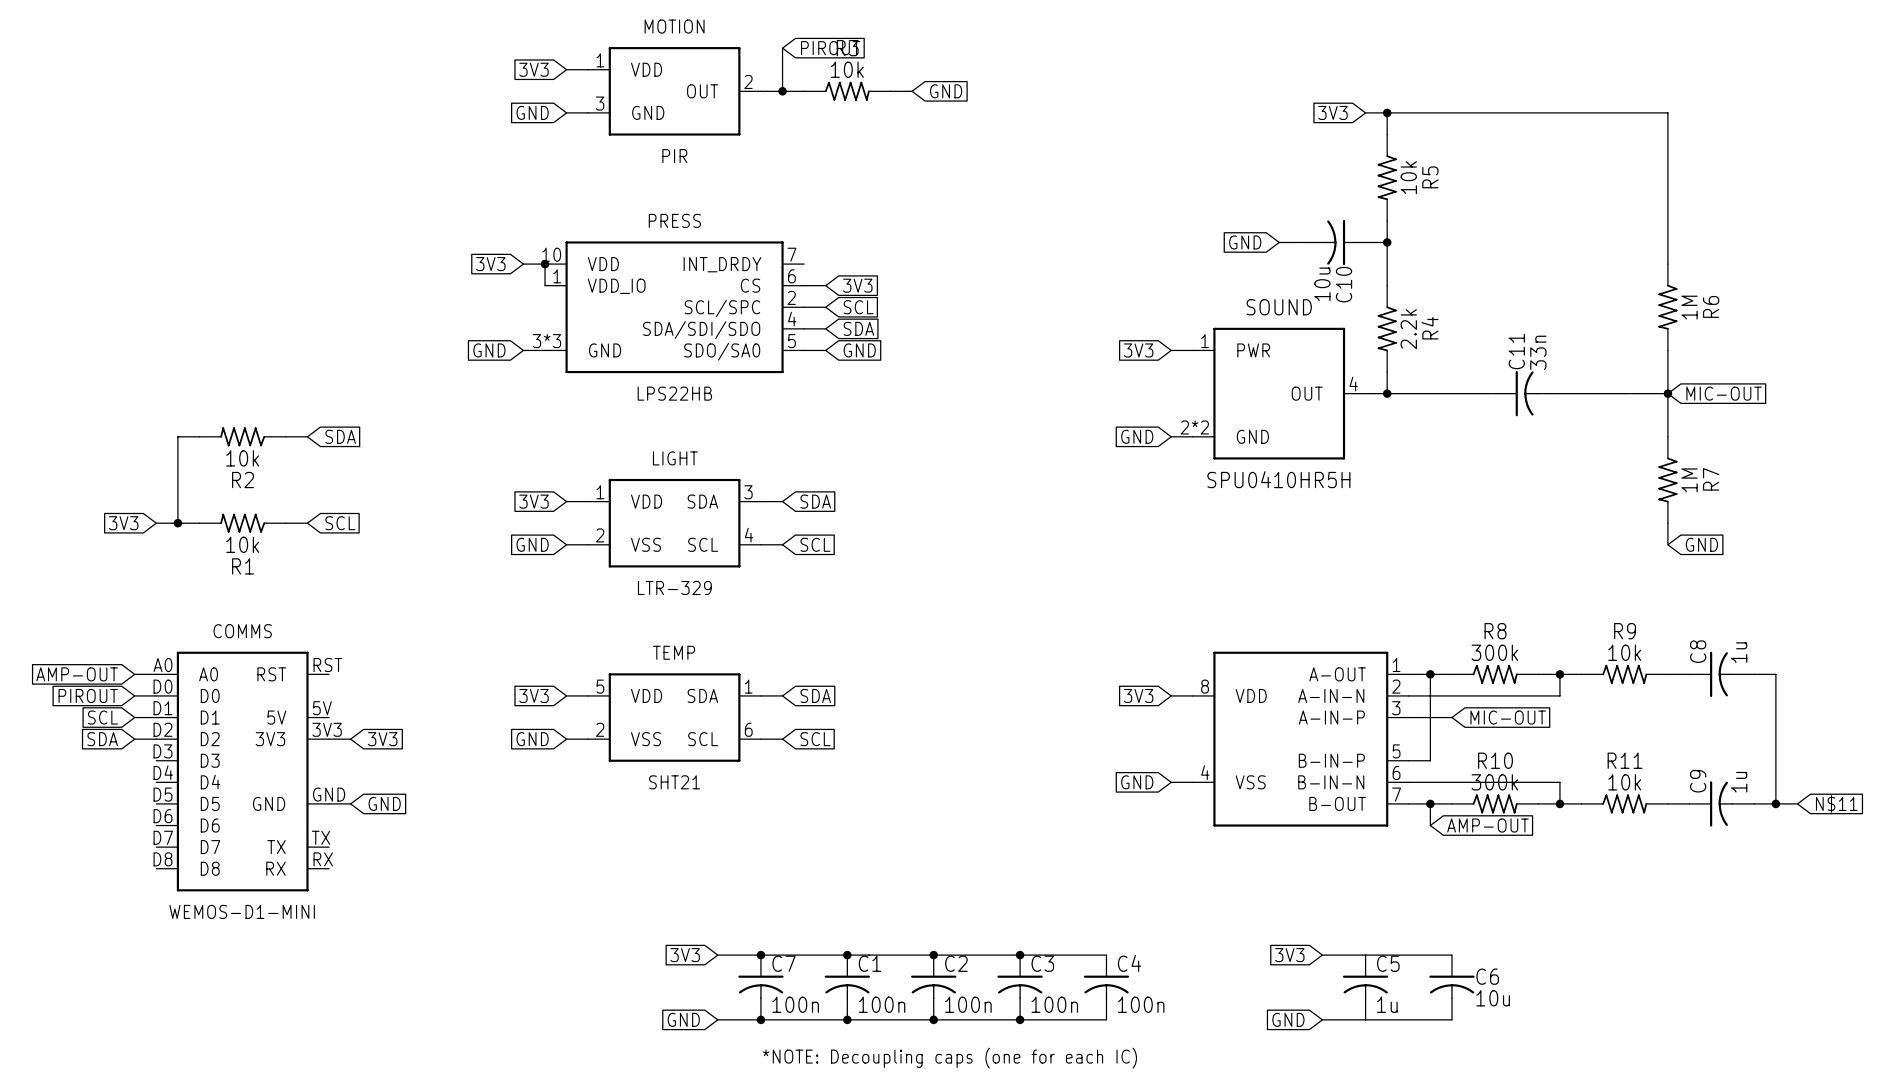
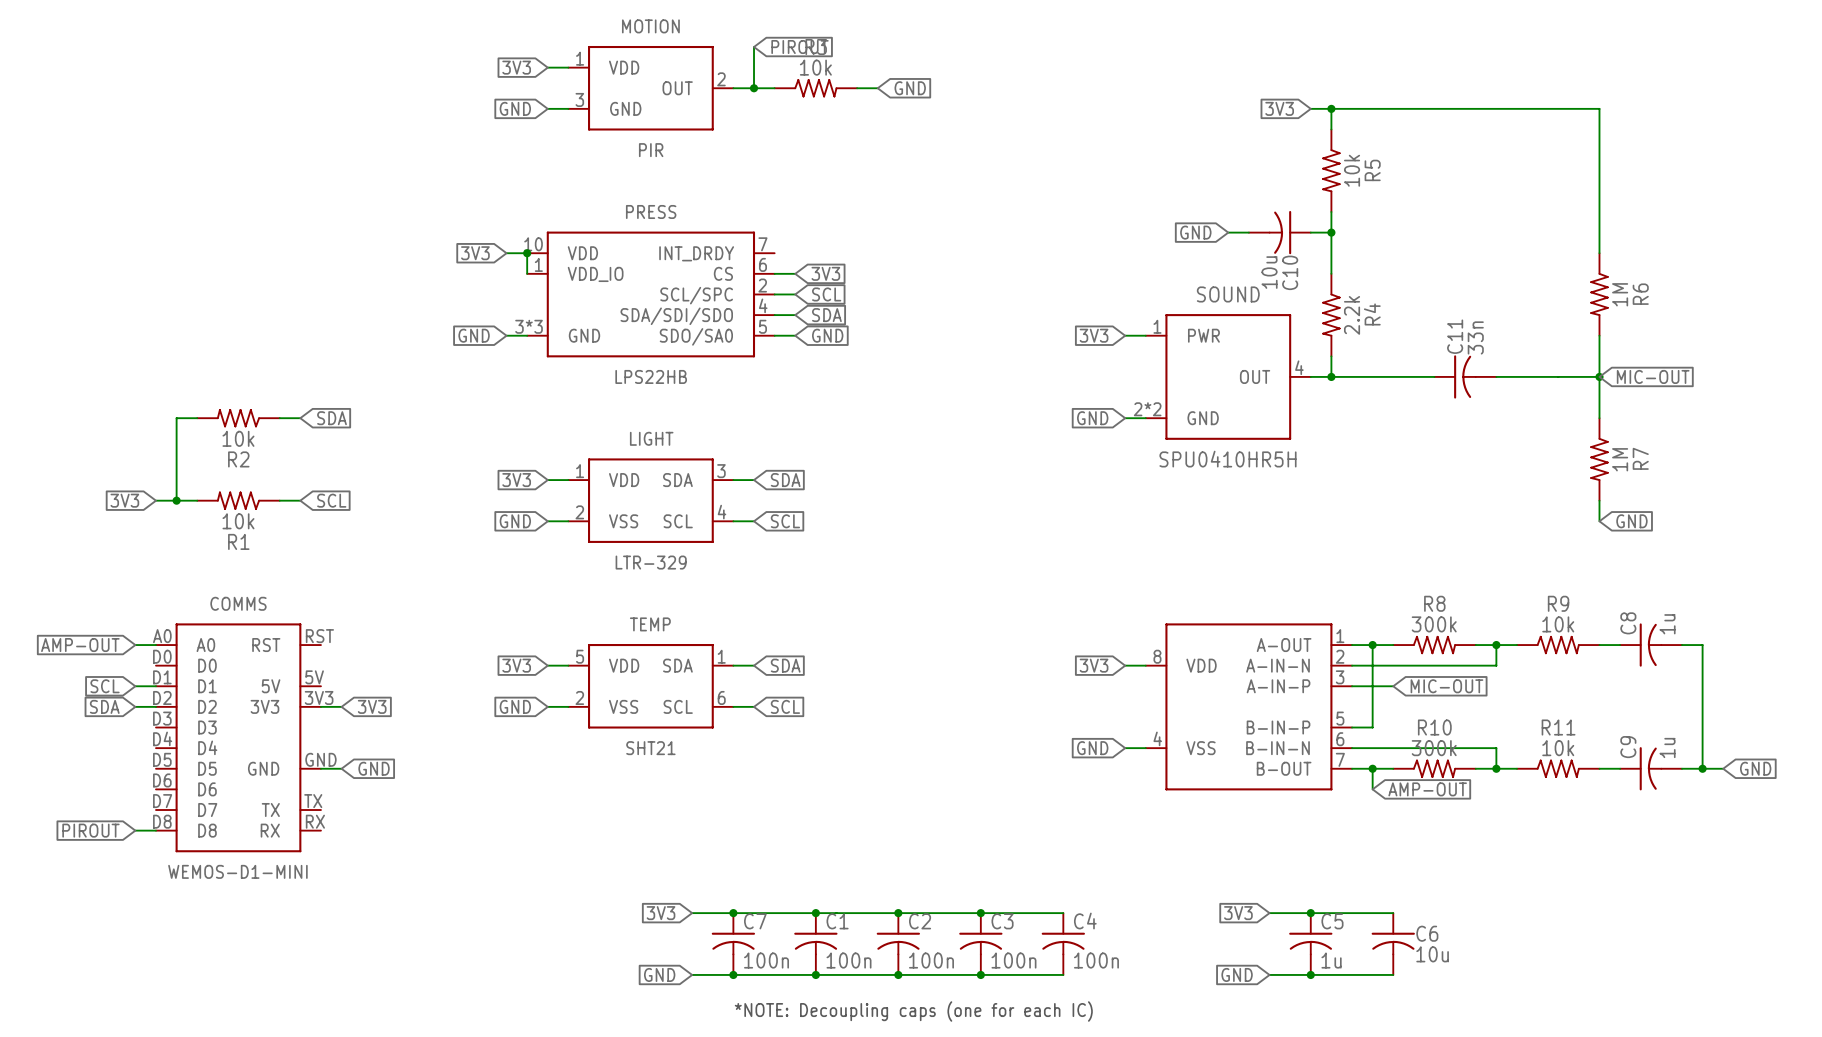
global label position: PIROUT (88, 695) -> PIROUT (90, 830)
wire: (134, 695) (156, 695) -> (135, 830) (155, 830)
global label: N$11 (1836, 803) -> GND (1755, 768)
junction: none -> (1310, 913)
junction: none -> (1310, 974)

